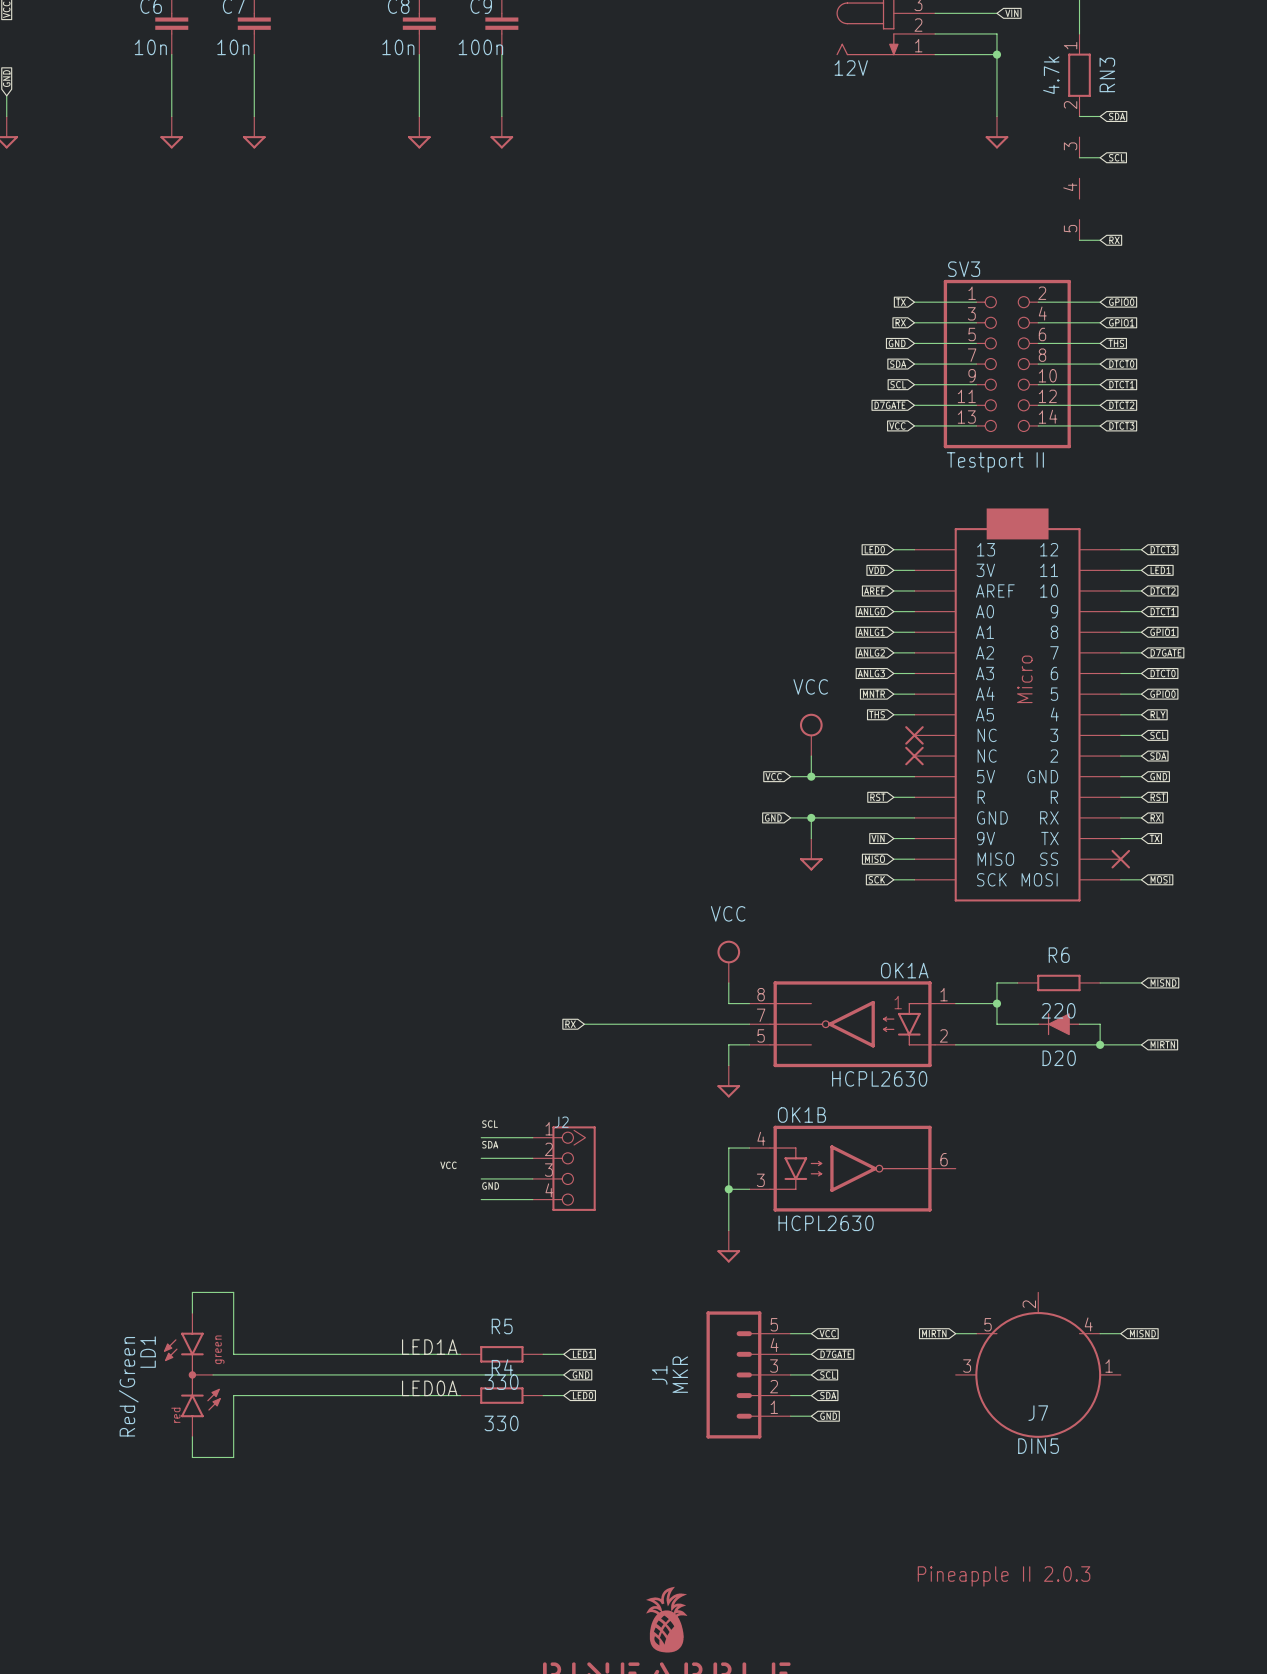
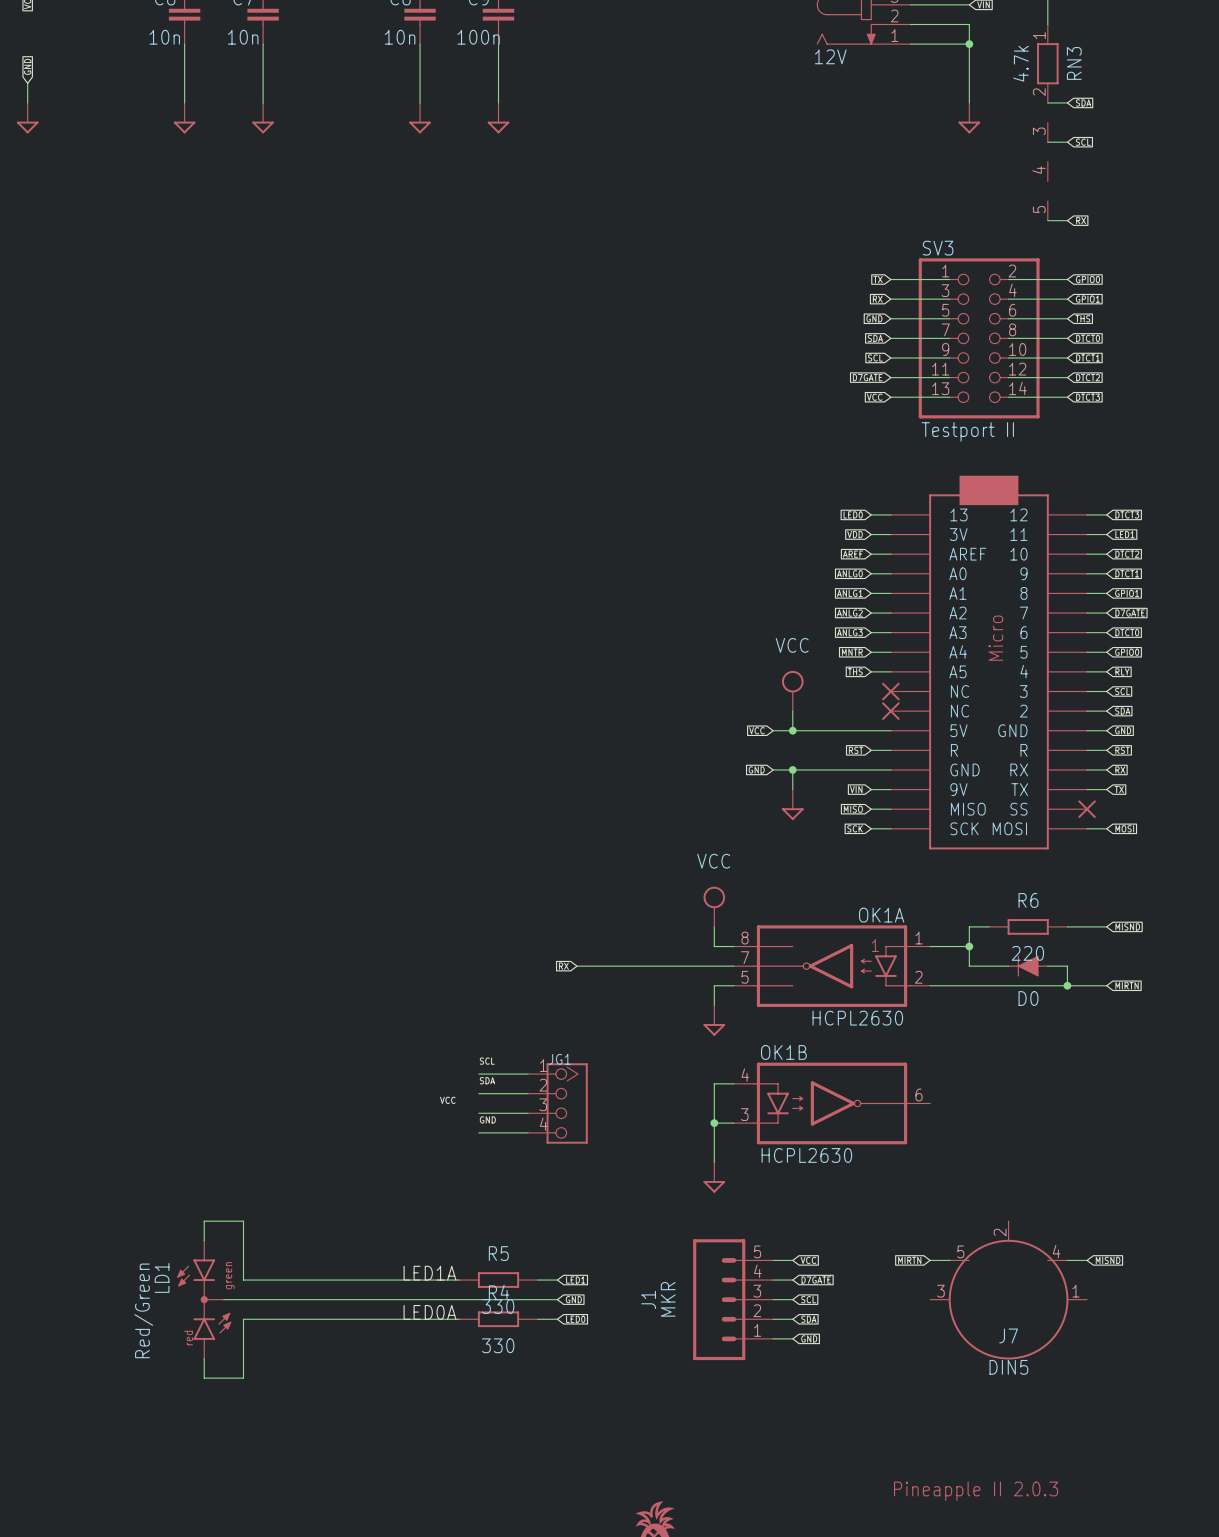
D20 name: D20 (1059, 1058) -> D0 (1028, 998)
J2 name: J2 (561, 1122) -> JG1 (559, 1059)

